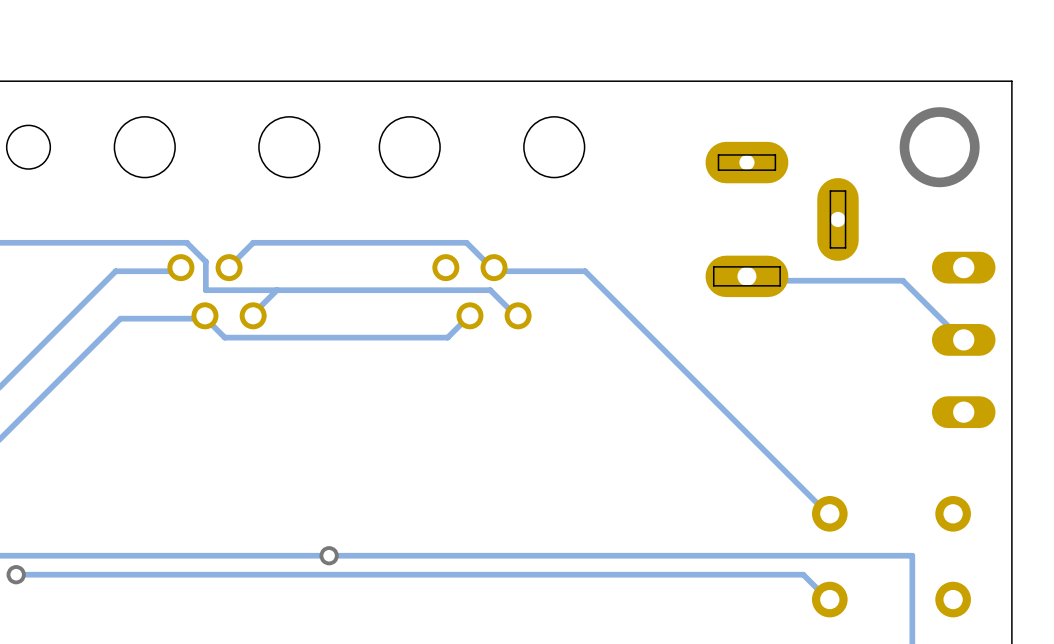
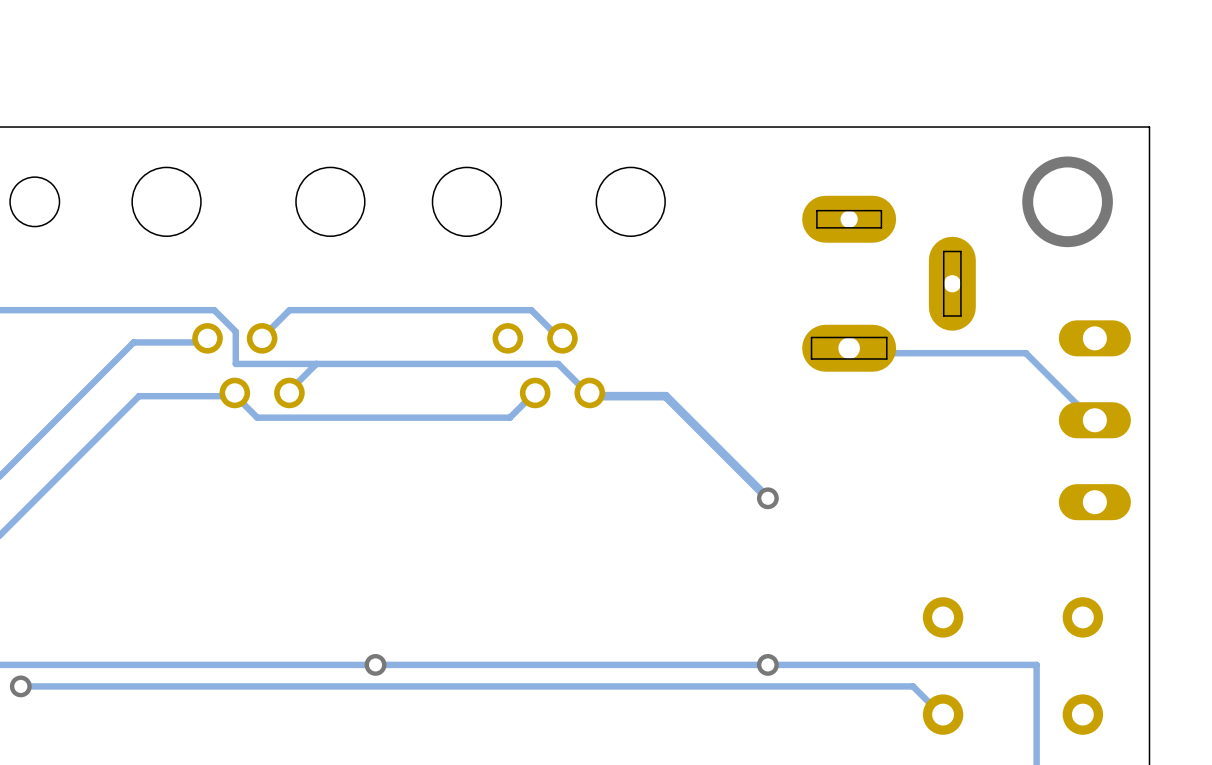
track: (494, 267) (495, 271) (585, 271) (829, 513) -> none
track: none -> (589, 392) (590, 396) (665, 396) (767, 498)
via: none -> (767, 498)
via: none -> (767, 664)

